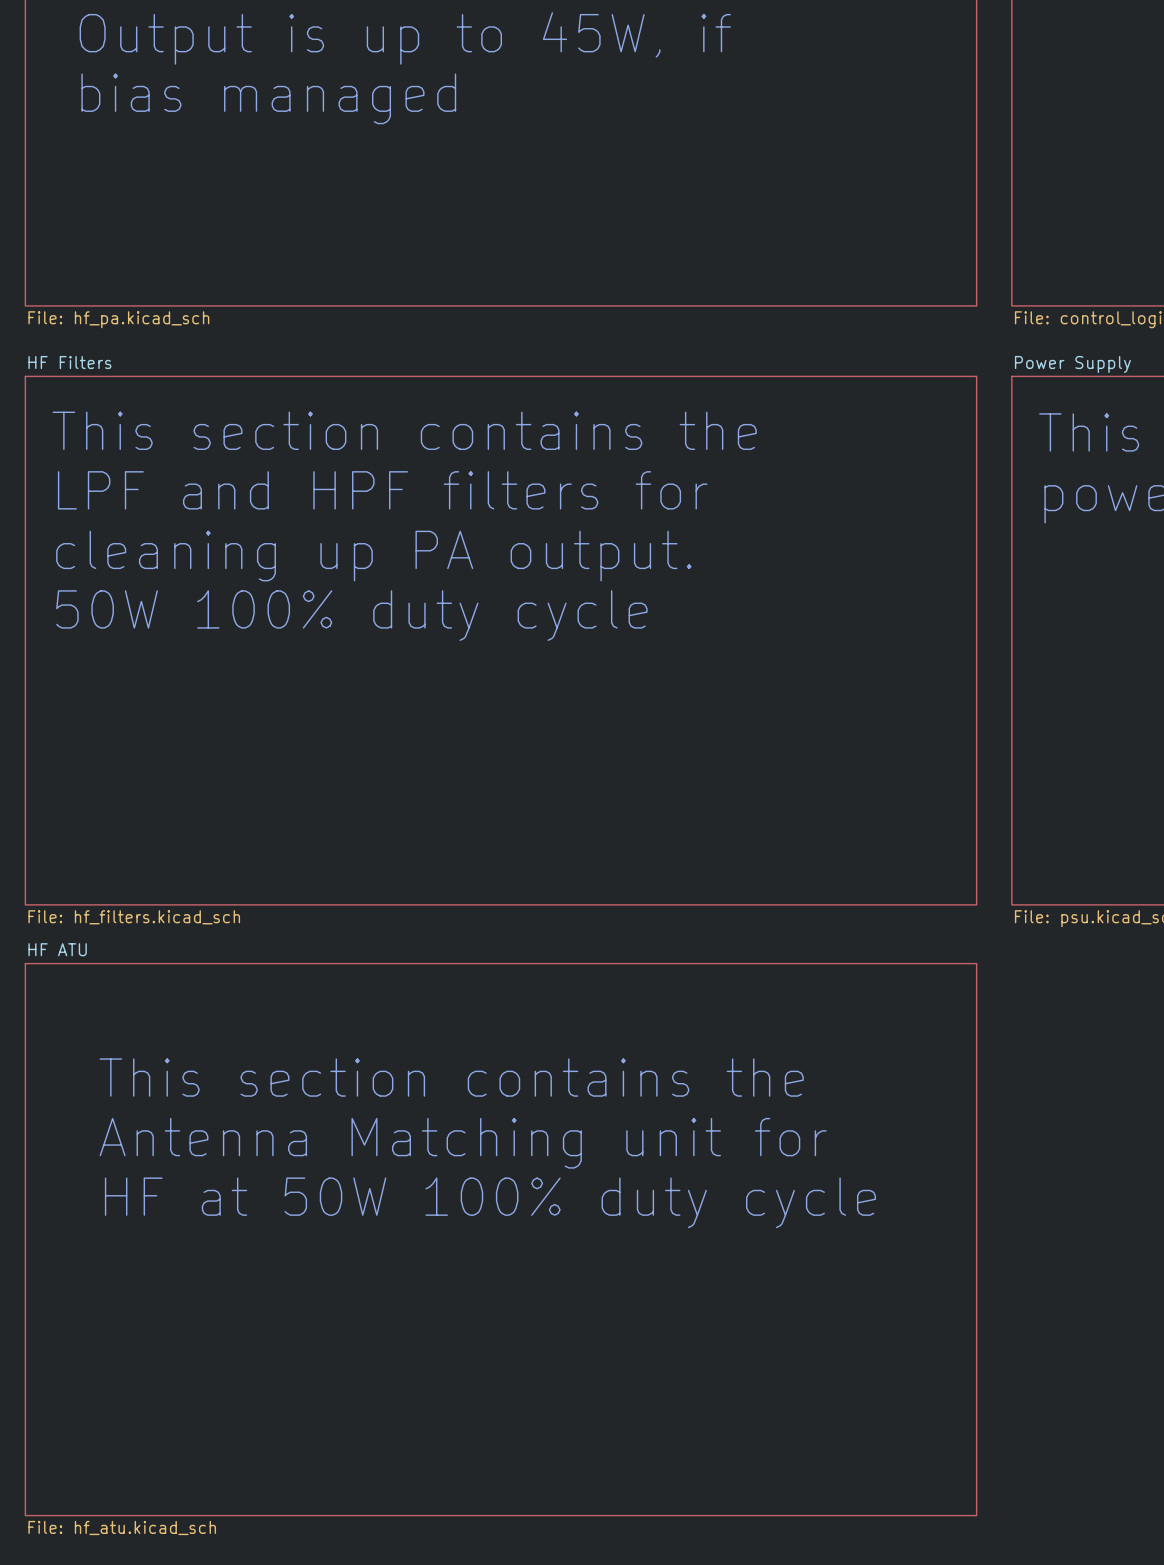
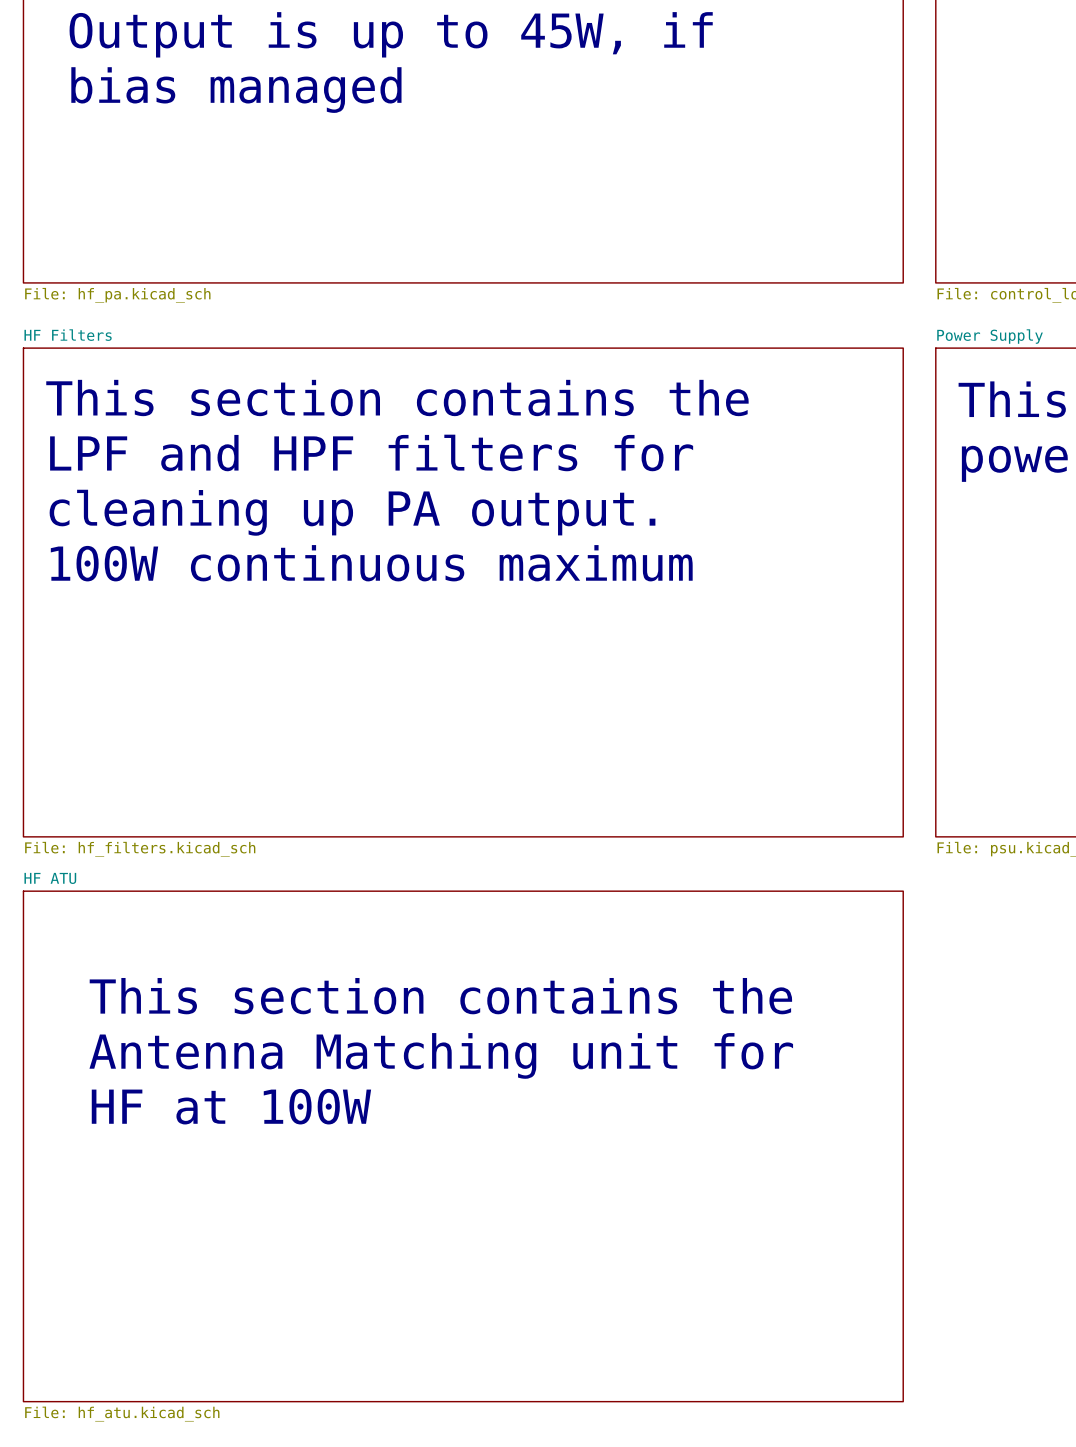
text: 50W 100% duty cycle (351, 615) -> 100W continuous maximum (371, 563)
text: HF at 50W 100% duty cycle (490, 1202) -> HF at 100W (231, 1106)

